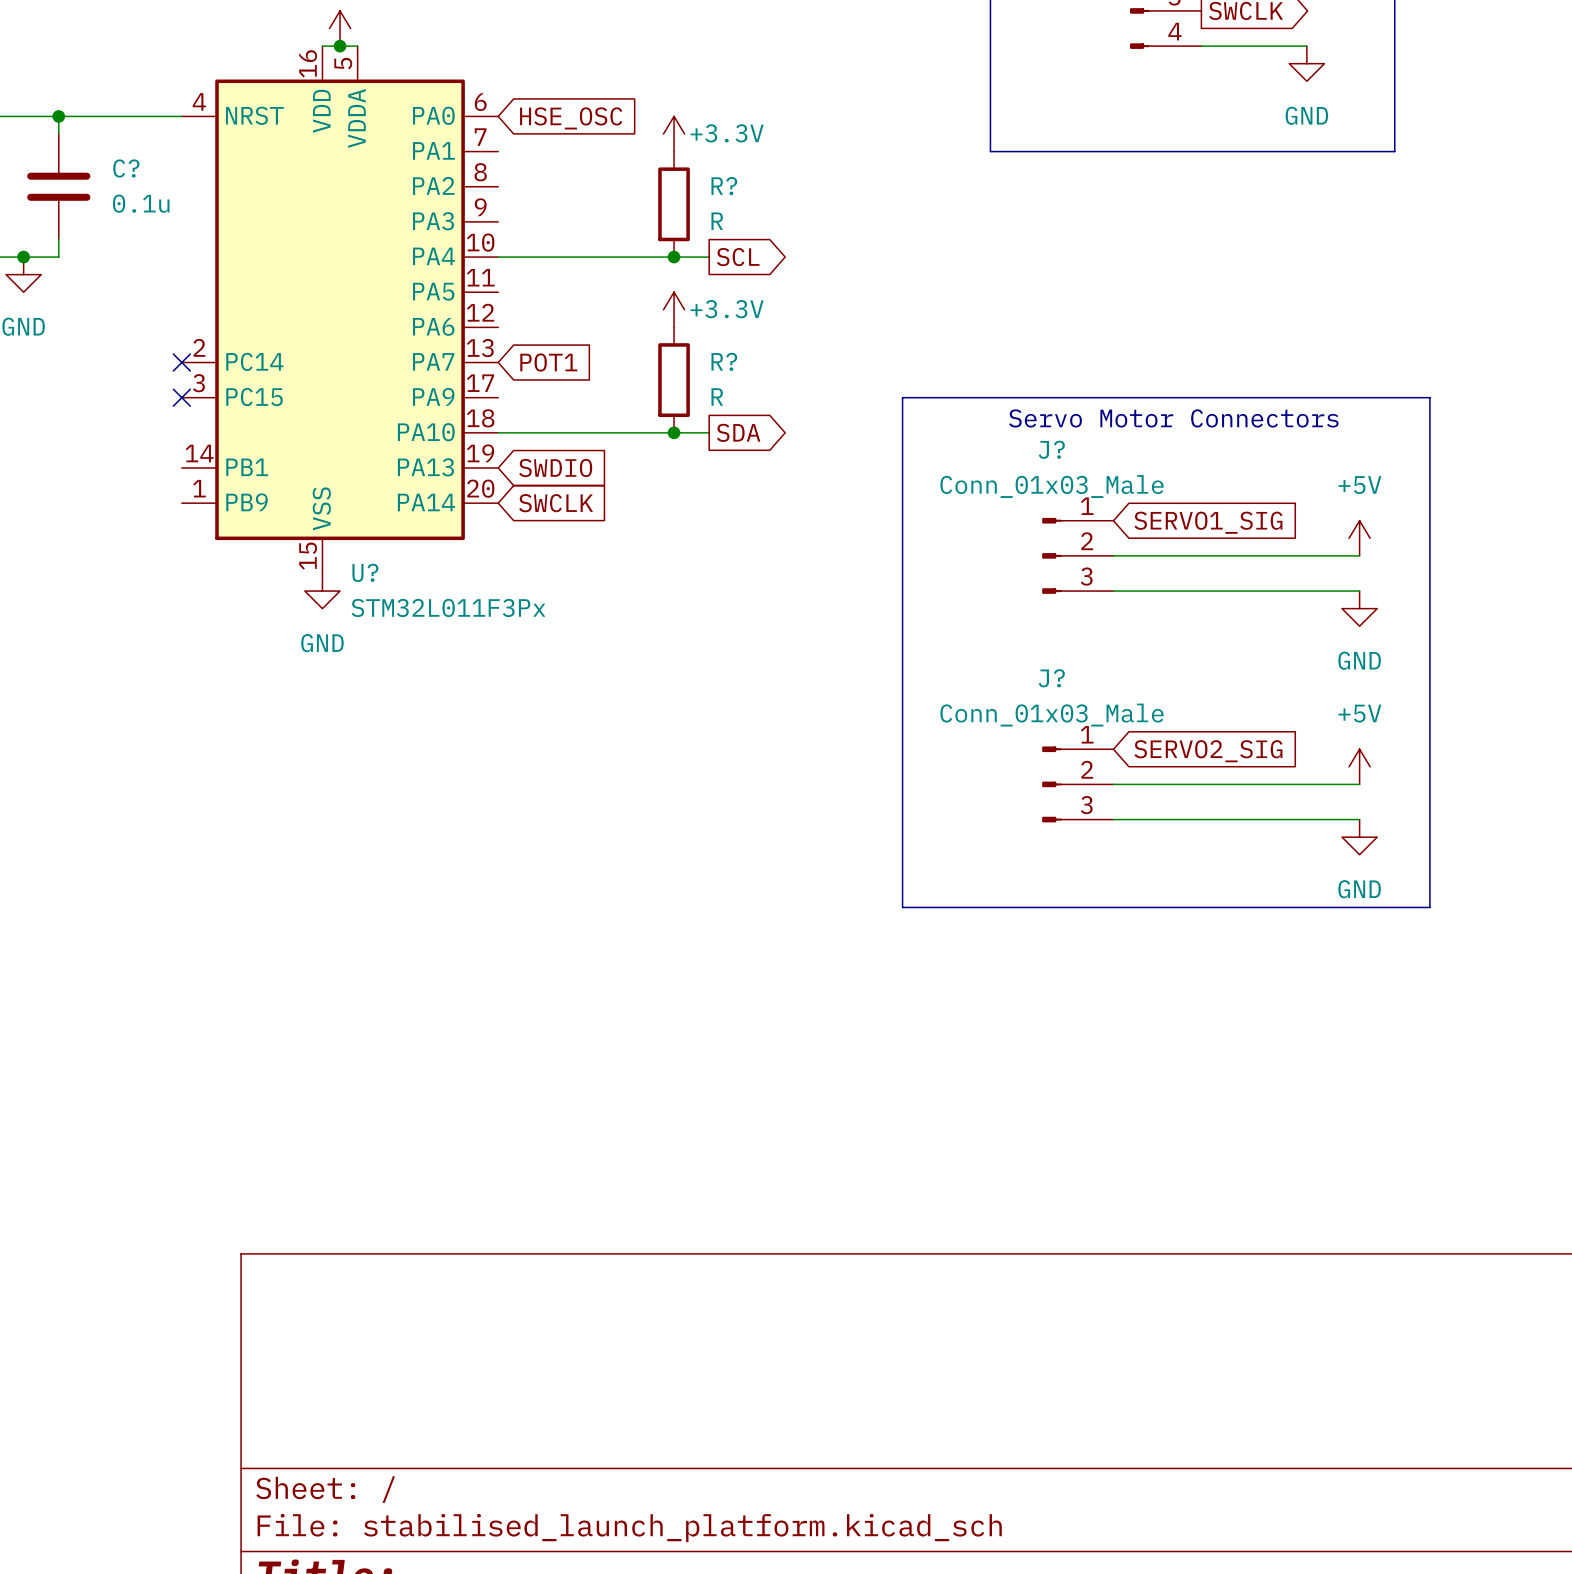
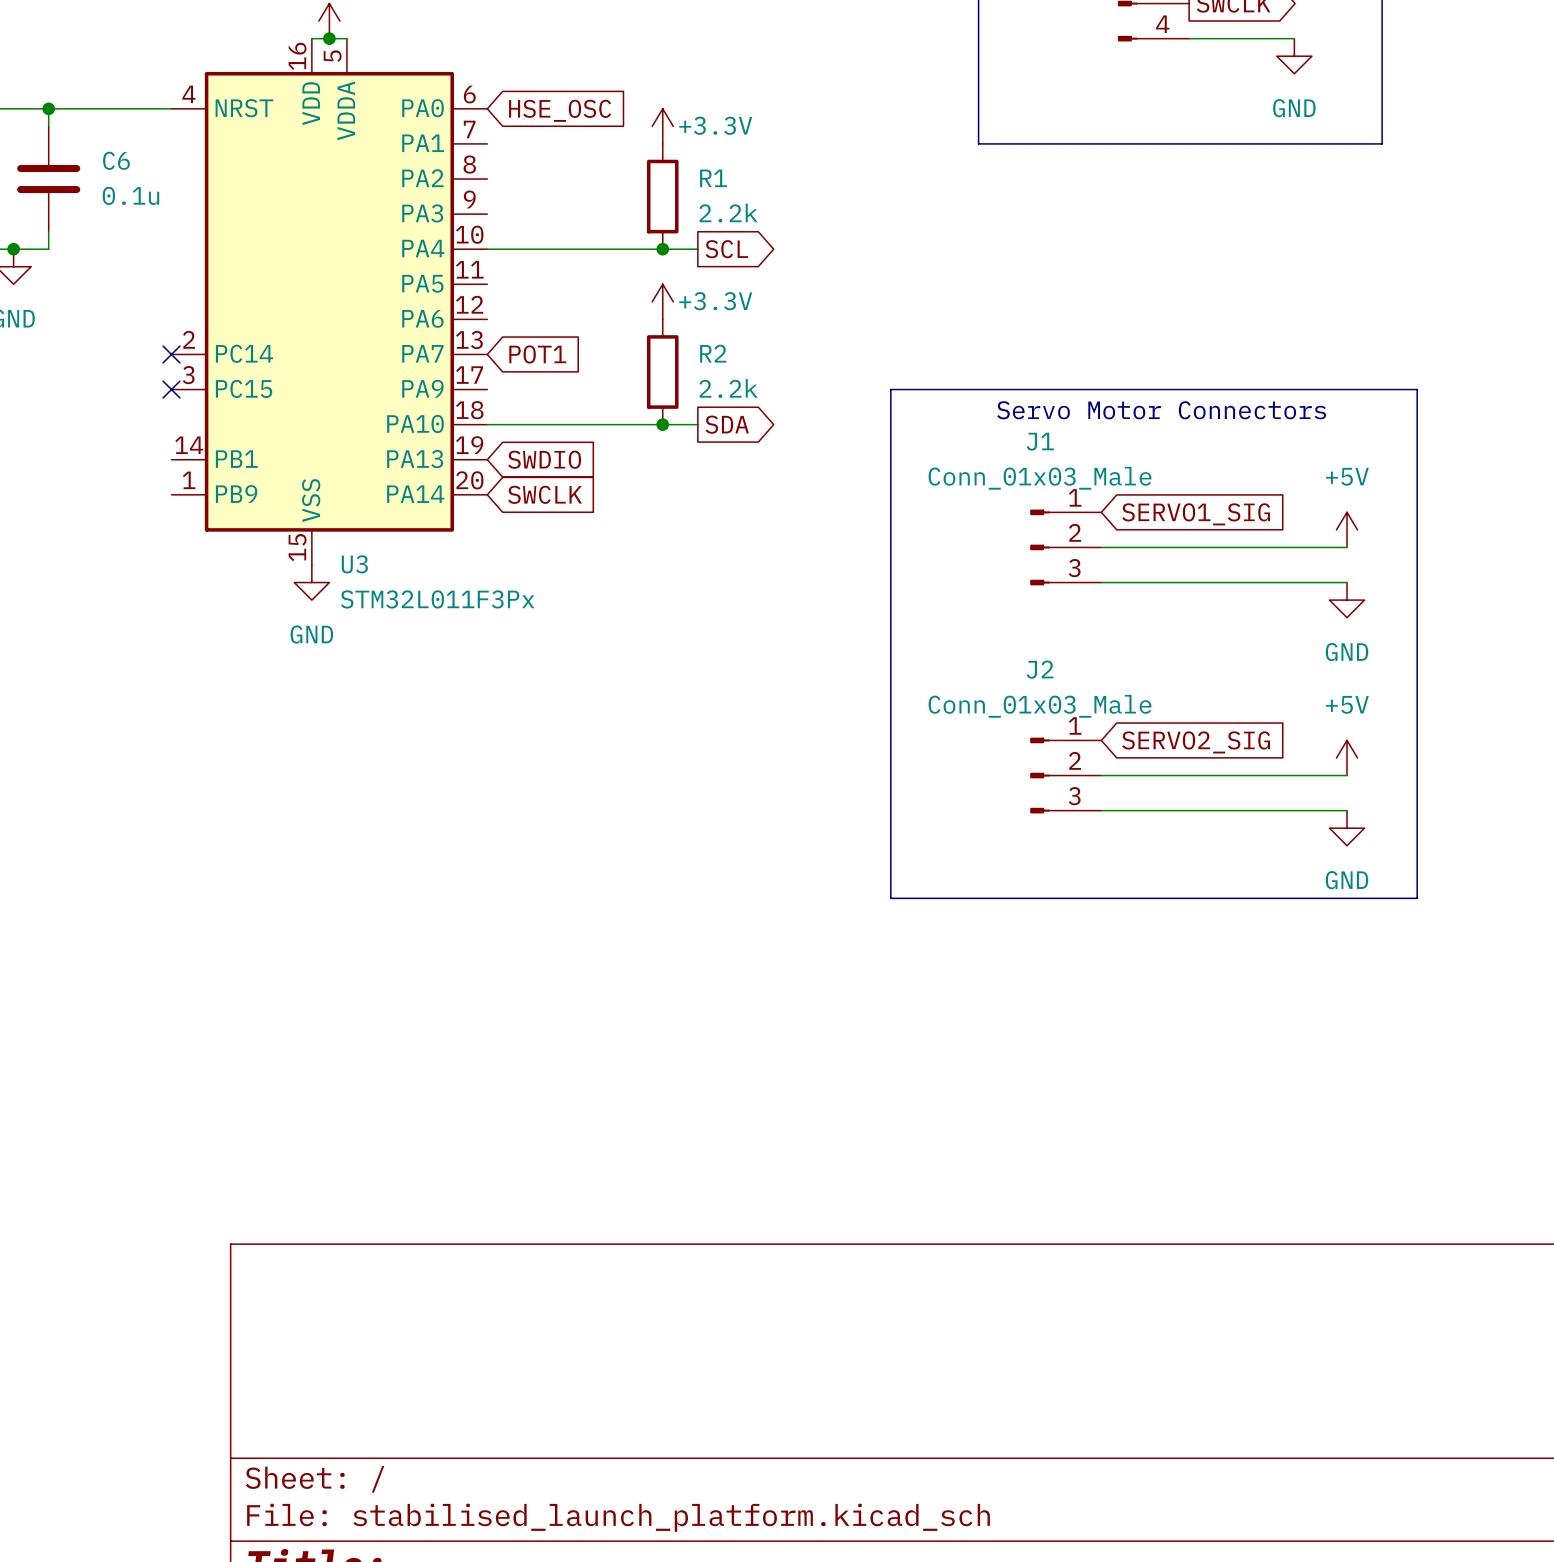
C? name: C? (126, 168) -> C6 (116, 160)
R? name: R? (724, 186) -> R1 (713, 178)
R? value: R (717, 221) -> 2.2k (728, 213)
R? name: R? (724, 361) -> R2 (713, 353)
R? value: R (717, 397) -> 2.2k (728, 388)
J? name: J? (1051, 449) -> J1 (1040, 441)
U? name: U? (365, 572) -> U3 (354, 564)
J? name: J? (1051, 678) -> J2 (1040, 669)

